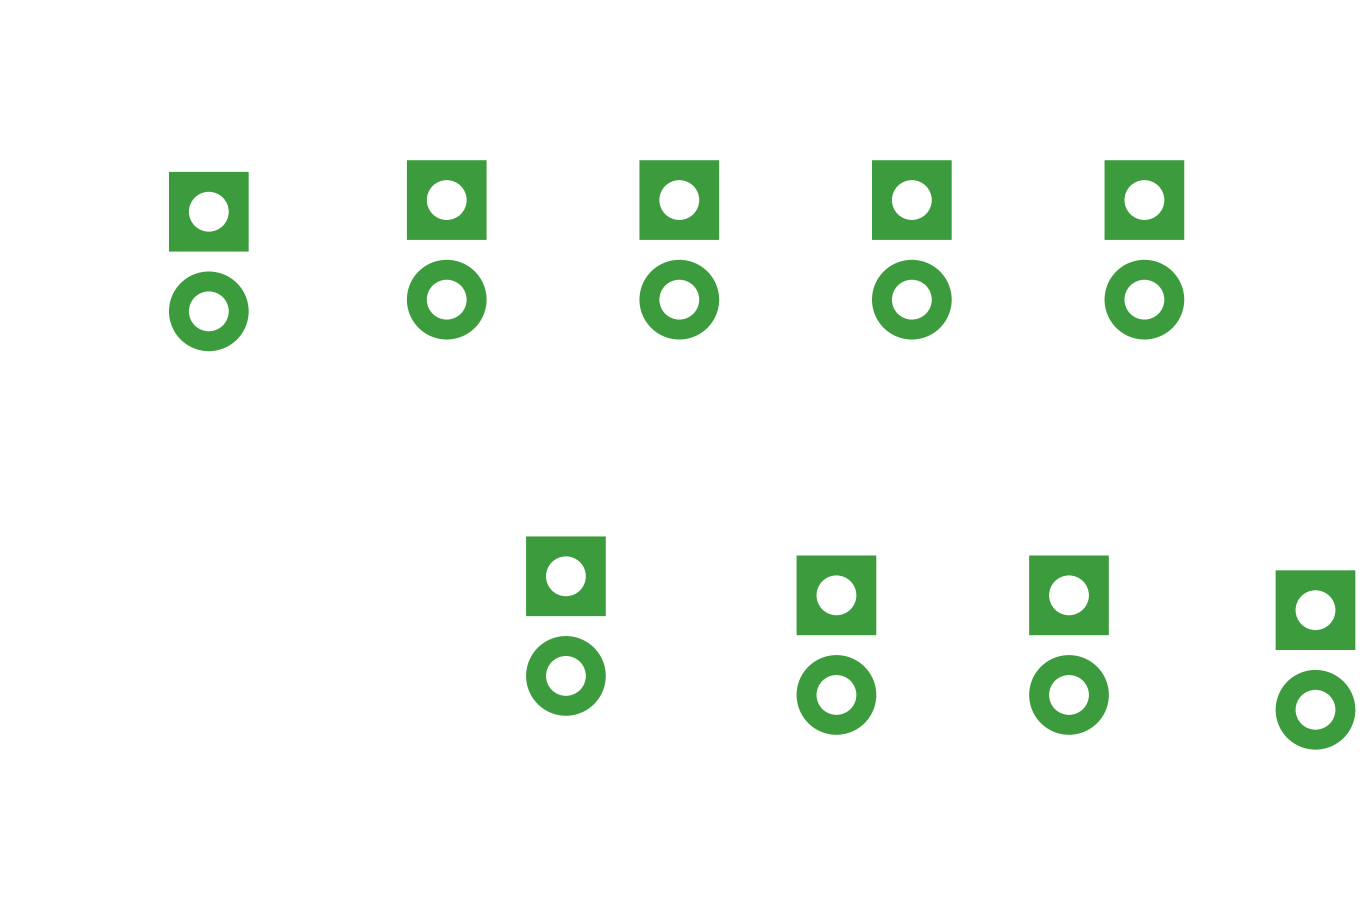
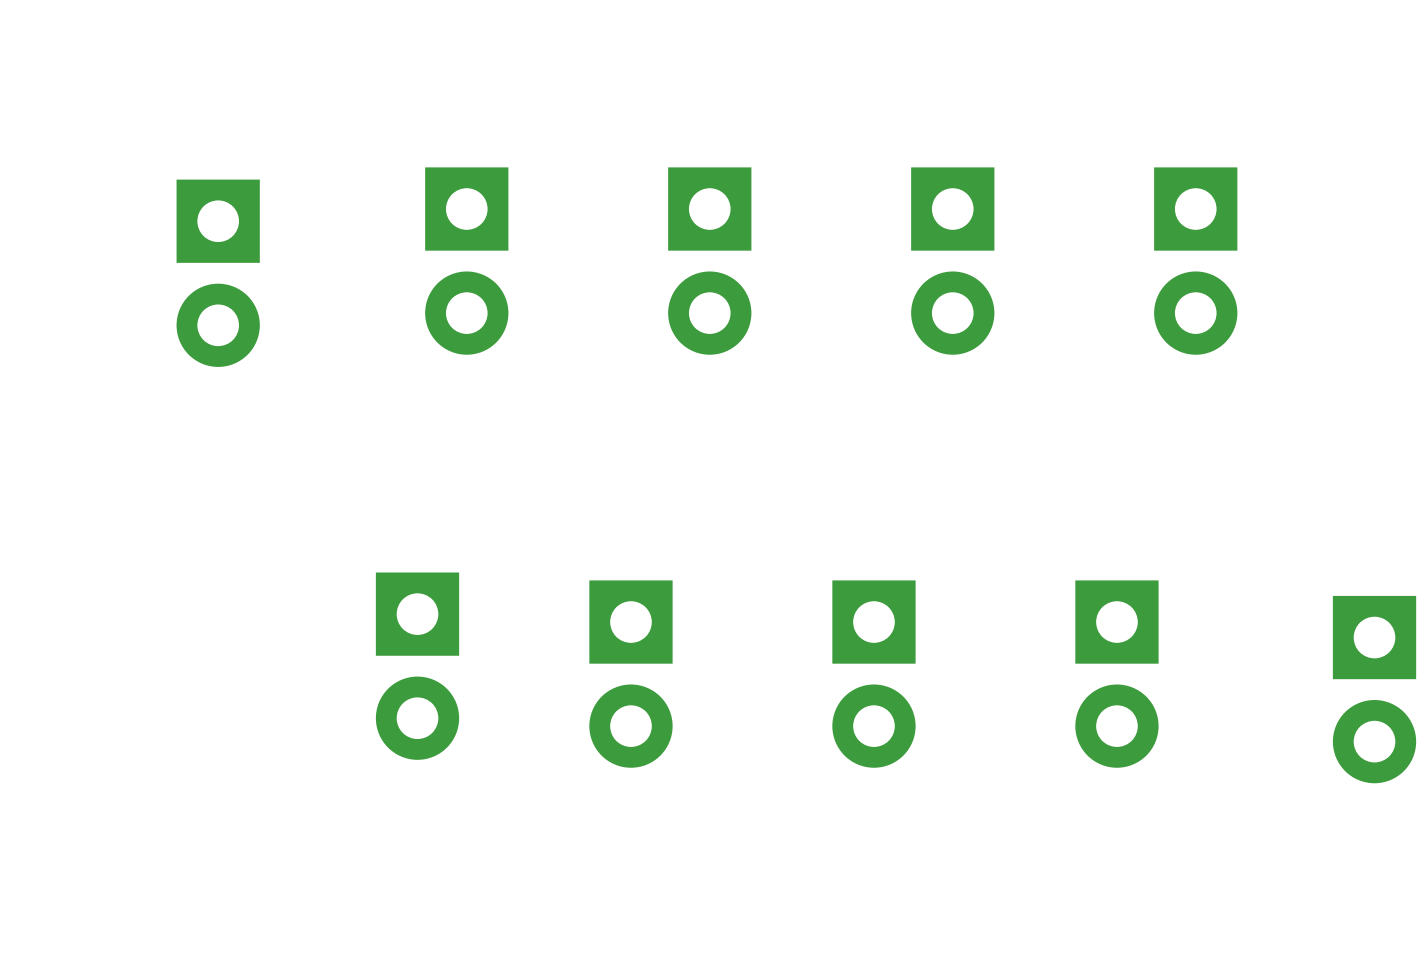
part position: (565, 626) -> (630, 674)
part: none -> (417, 666)

